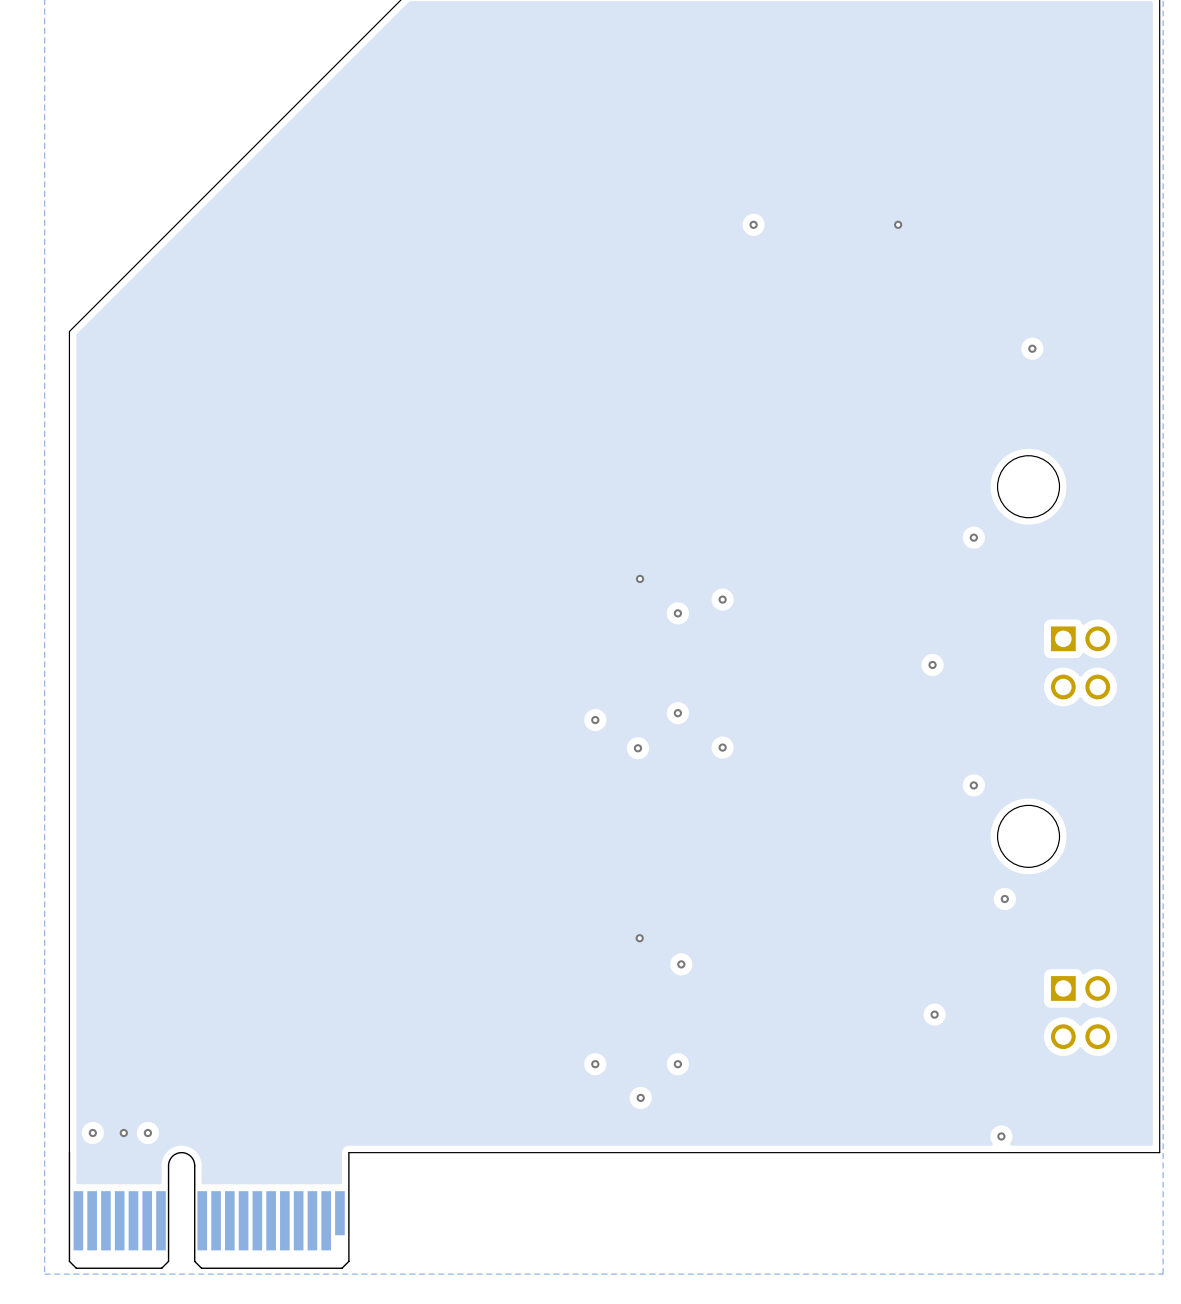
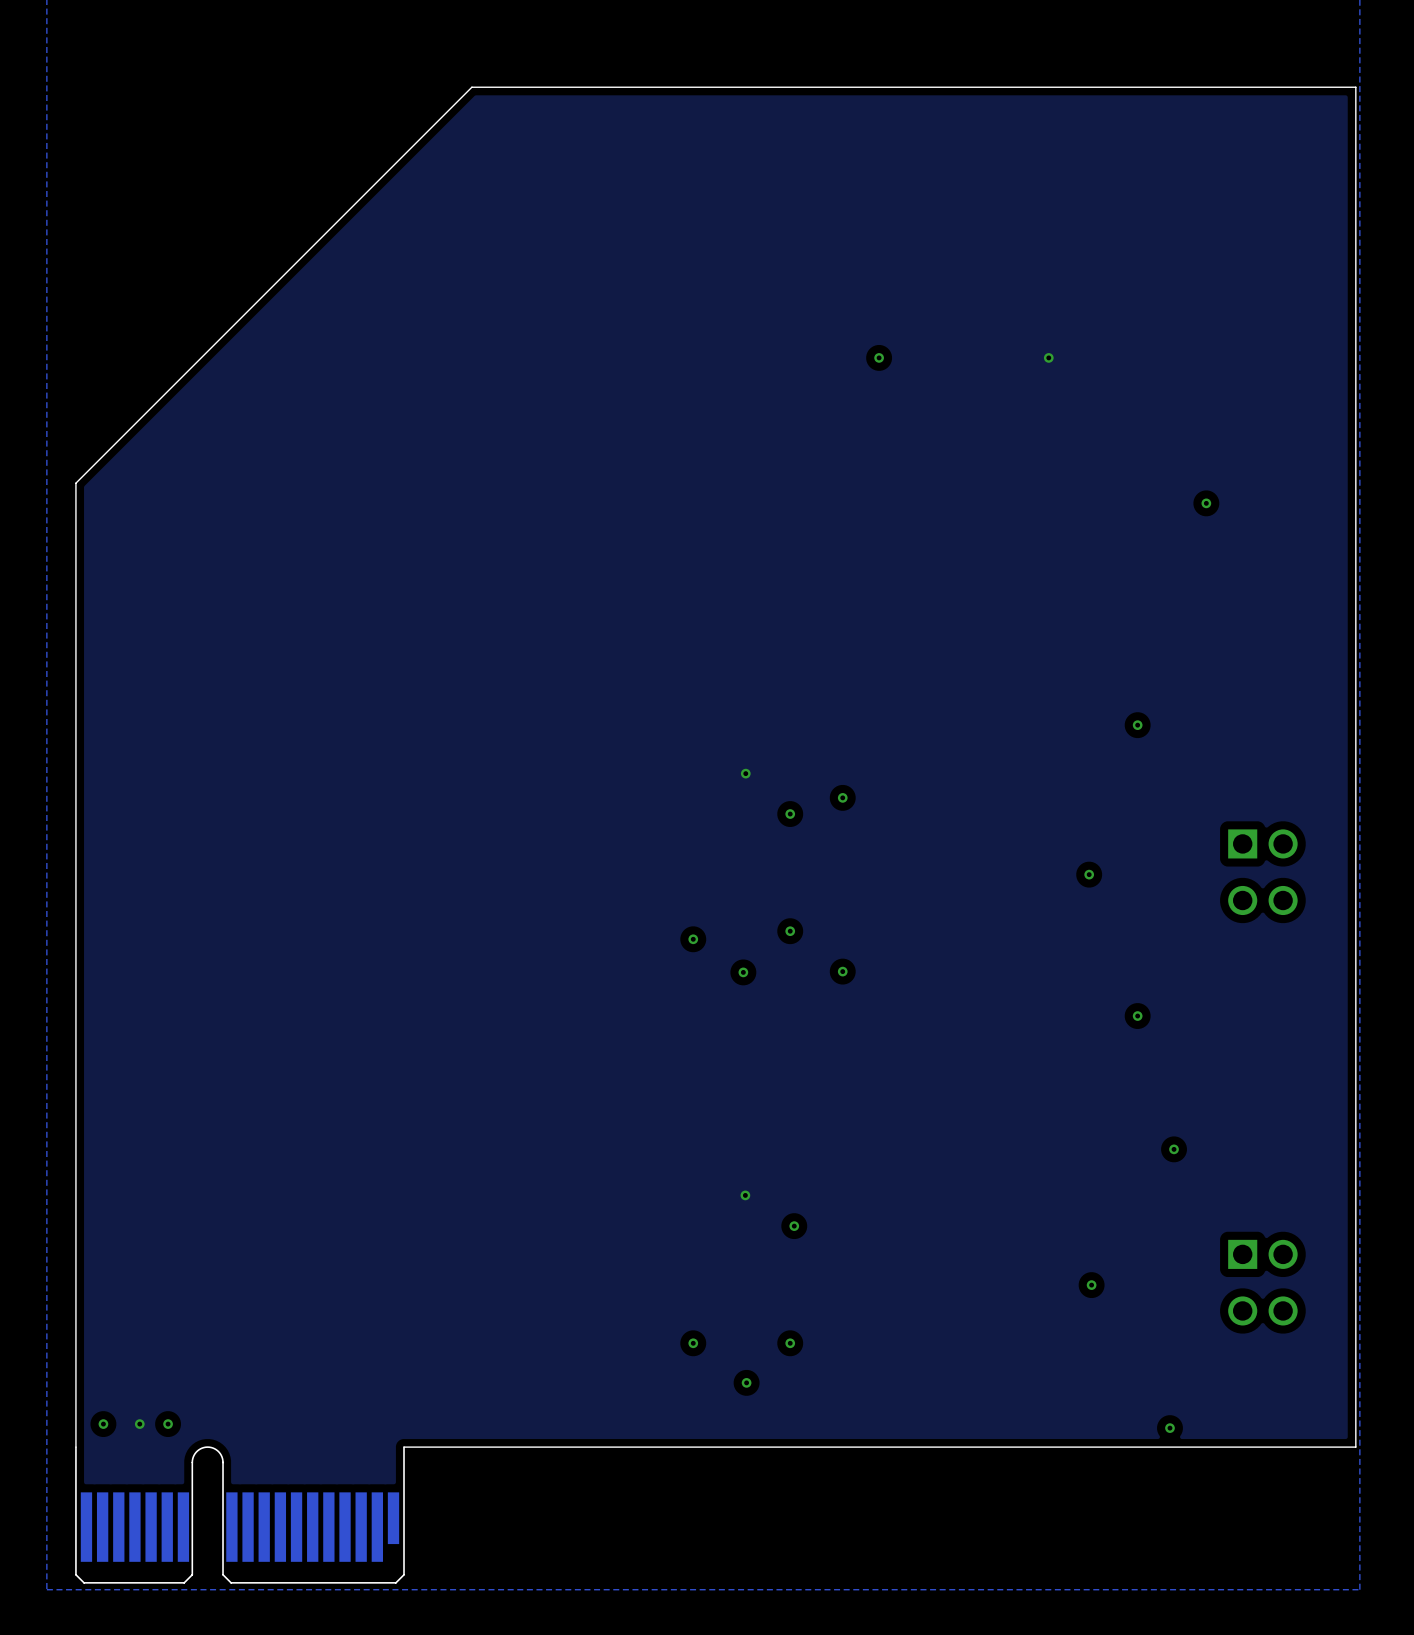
round board edge: [997, 455, 1060, 519] -> none
round board edge: [997, 805, 1060, 868] -> none

